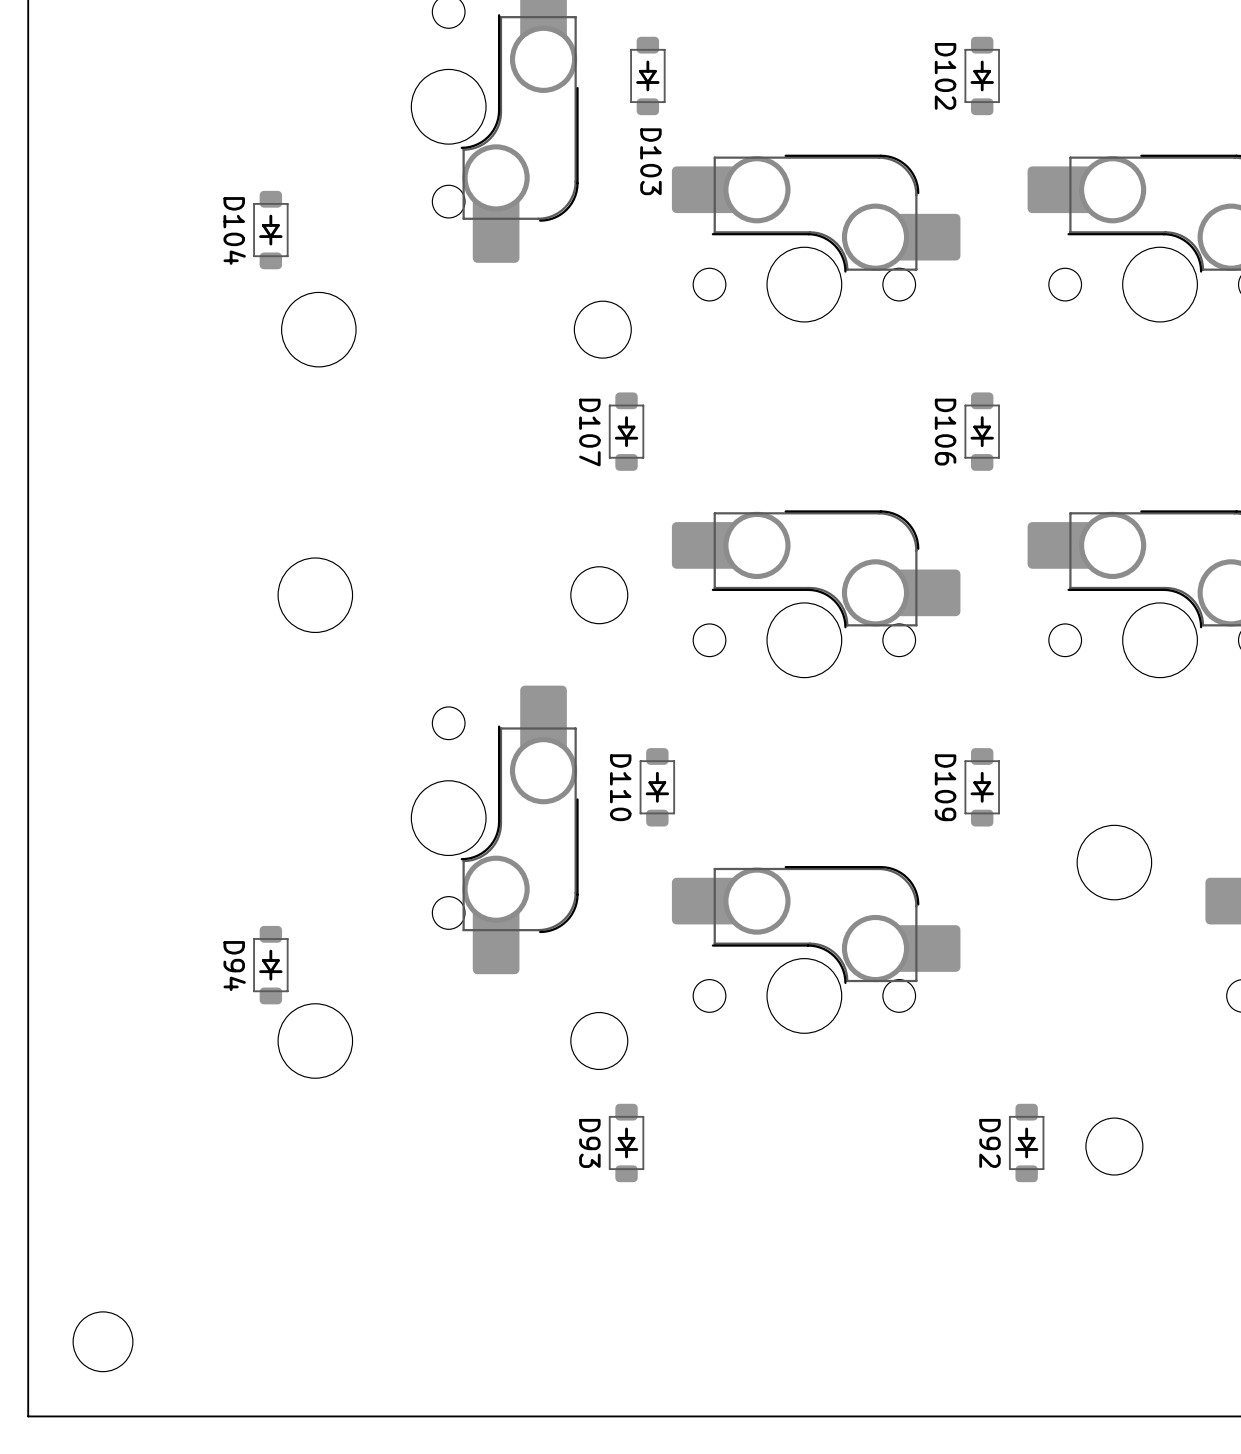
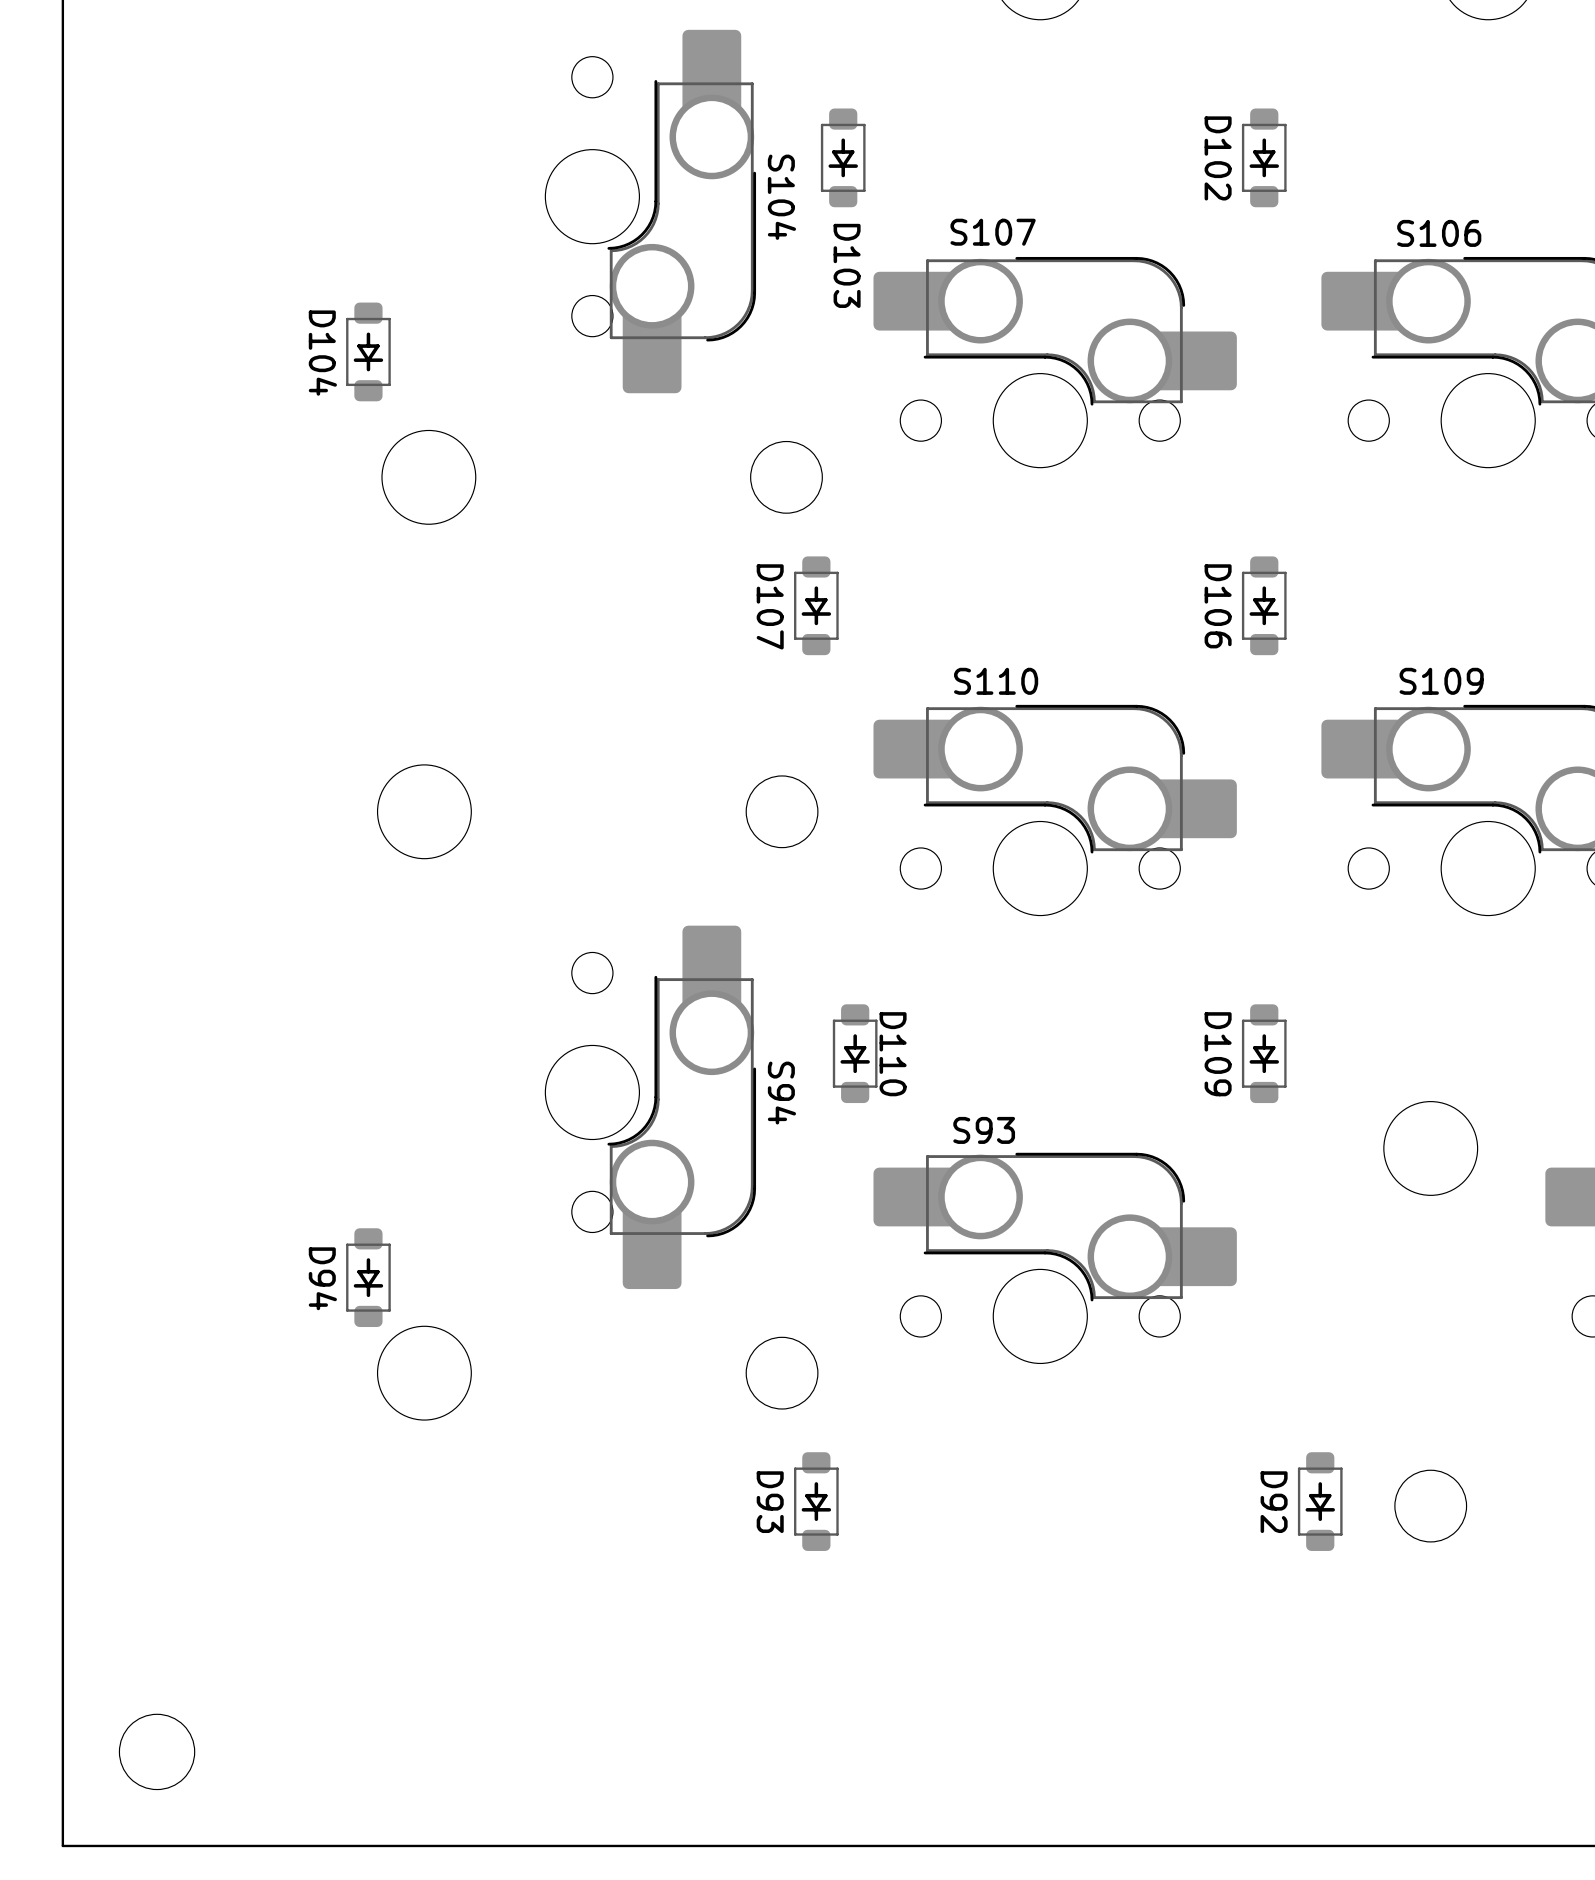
S104 name: none -> S104 (781, 197)
S107 name: none -> S107 (993, 232)
S106 name: none -> S106 (1439, 233)
S110 name: none -> S110 (996, 681)
S109 name: none -> S109 (1441, 681)
D110 name position: D110 (620, 787) -> D110 (893, 1054)
S94 name: none -> S94 (781, 1093)
S93 name: none -> S93 (984, 1130)

